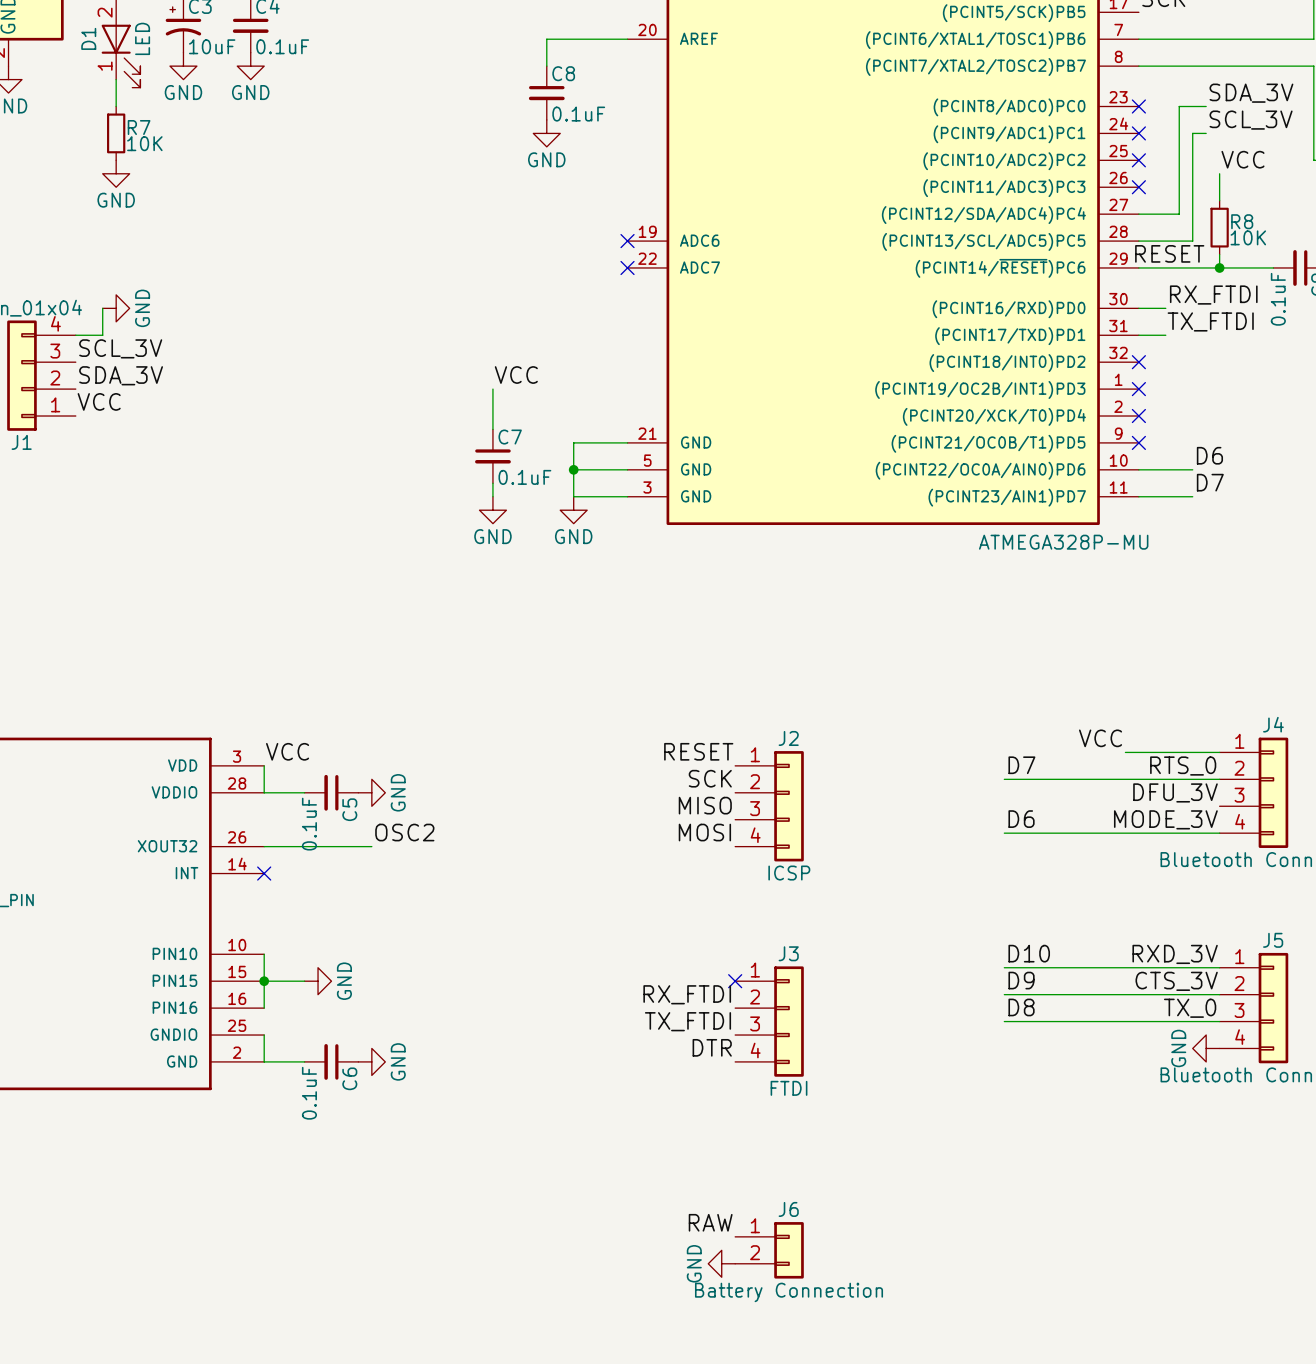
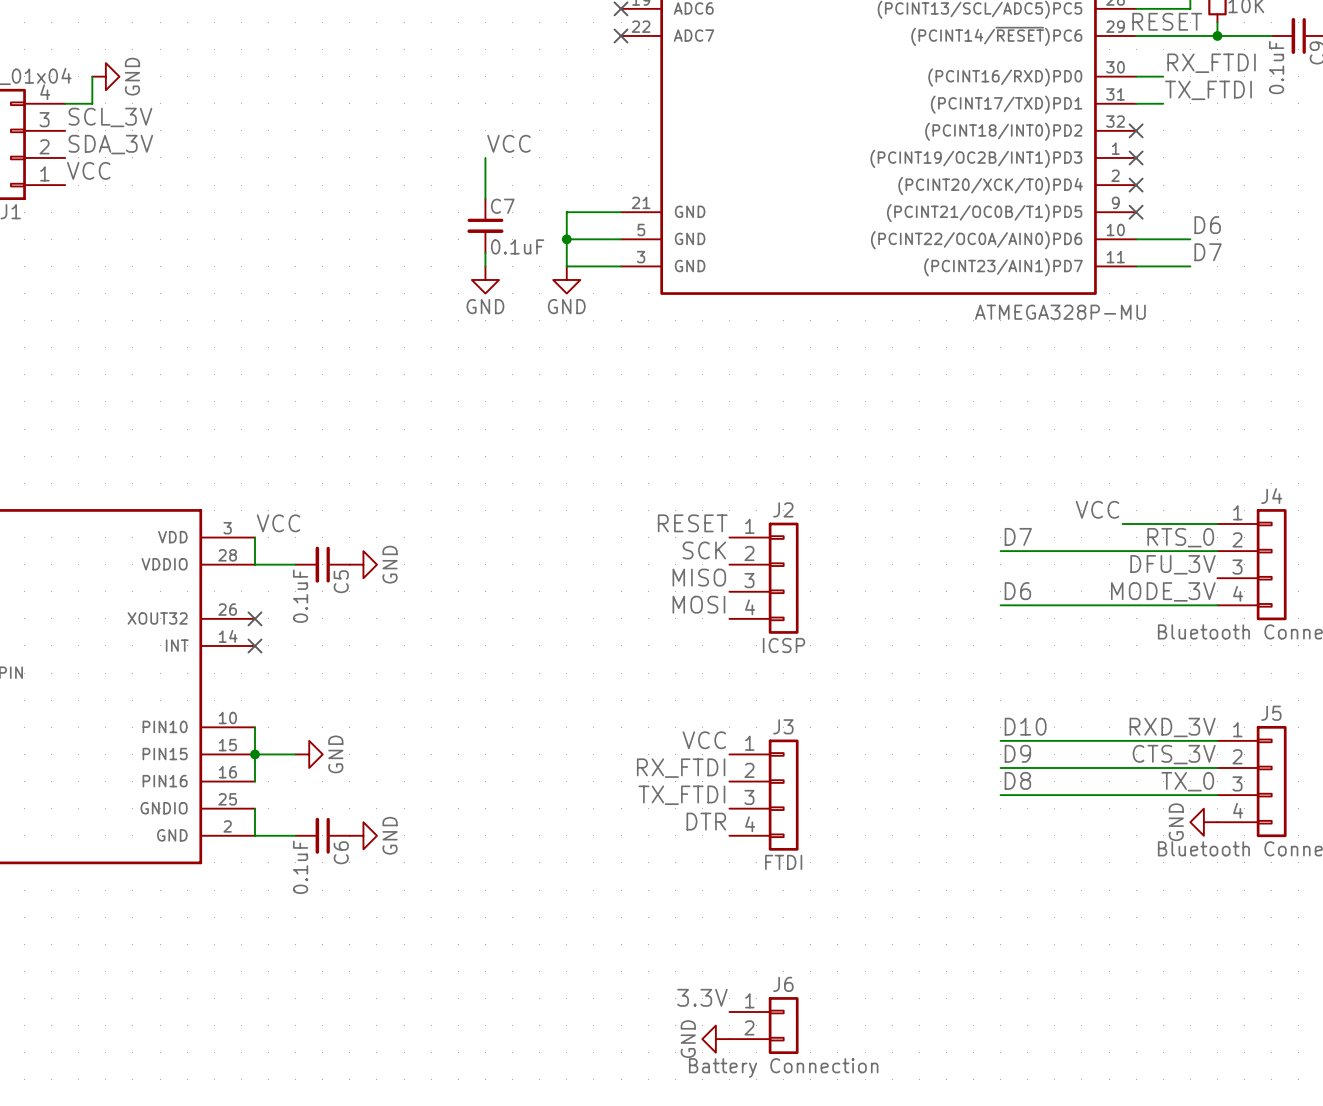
label: OSC2 (404, 832) -> none
wire: (264, 846) (371, 846) -> none
no-connect mark: none -> (254, 618)
label: none -> VCC (704, 740)
no-connect mark: (735, 981) -> none
label: RAW (710, 1222) -> 3.3V (702, 997)

